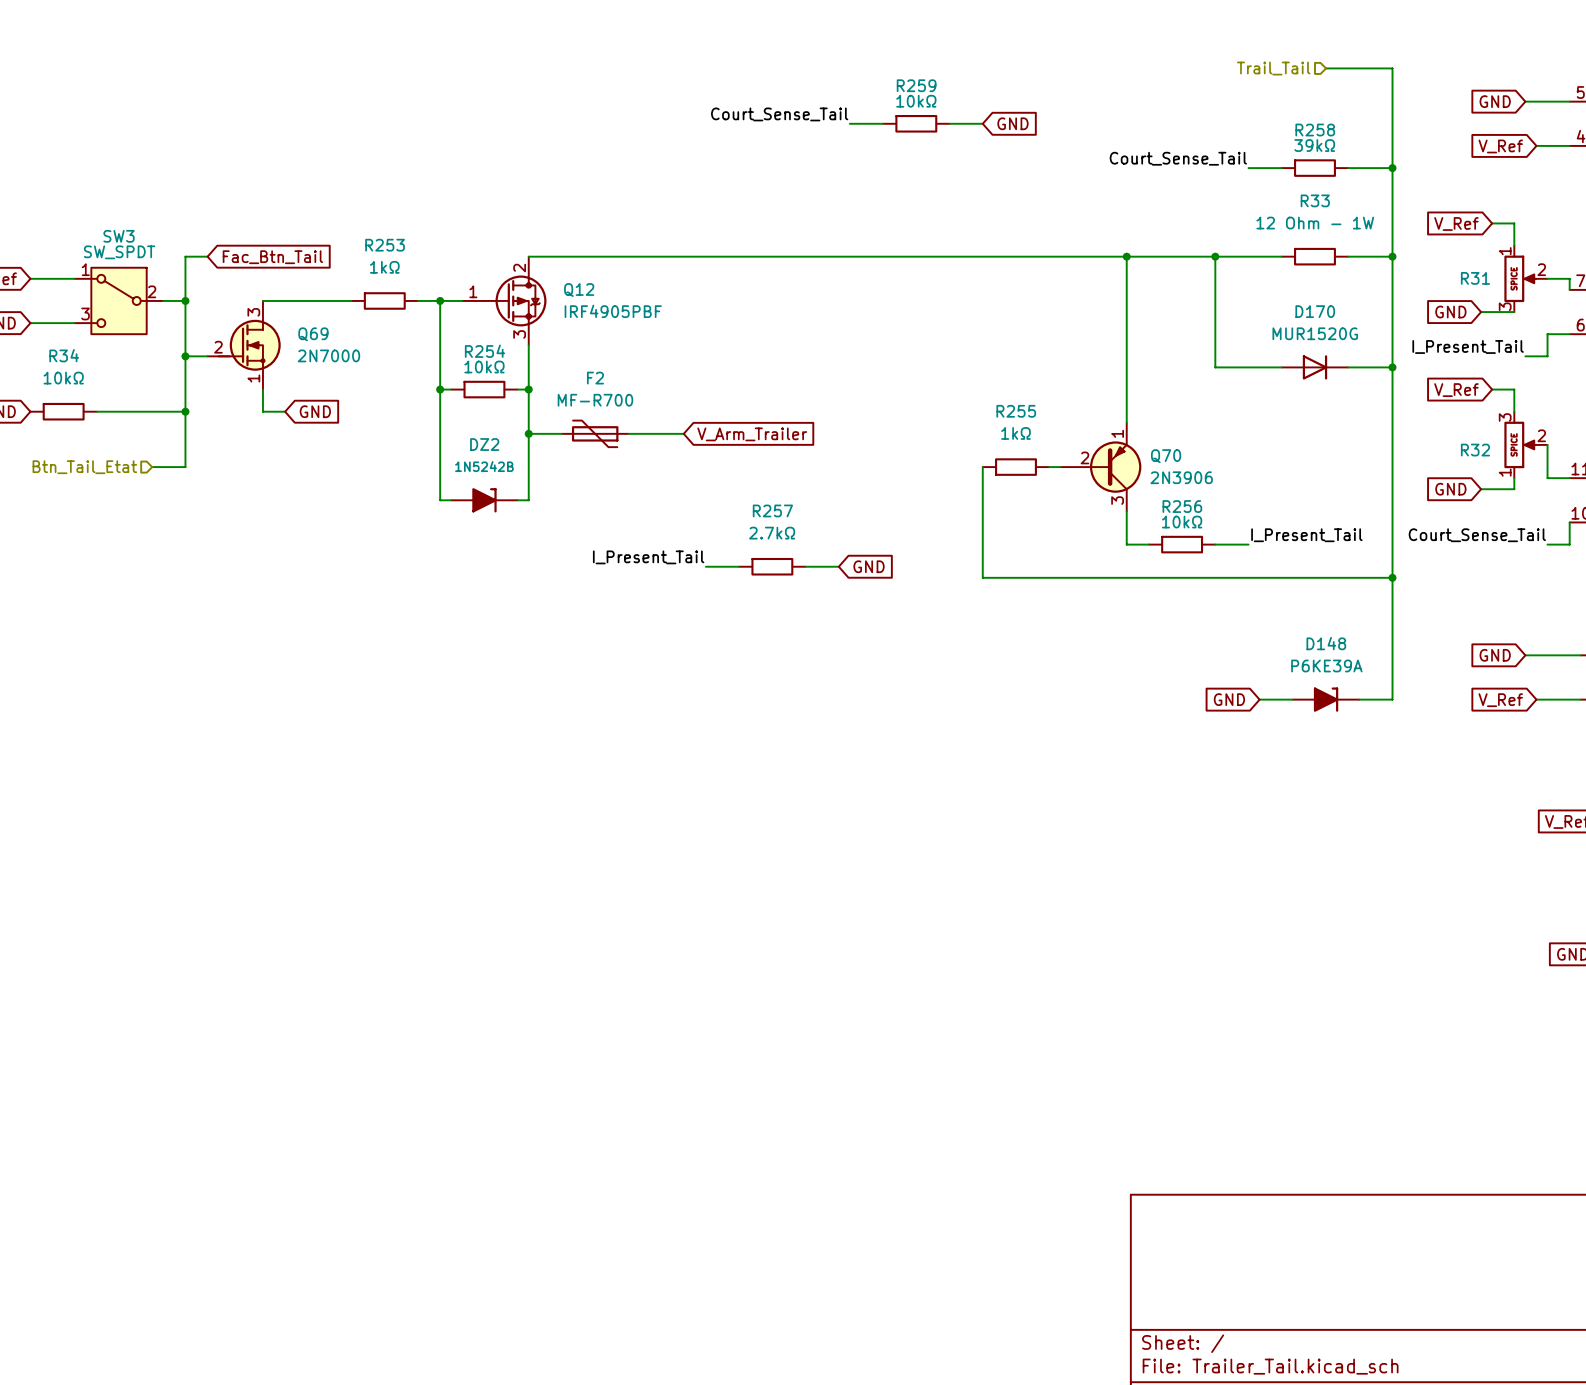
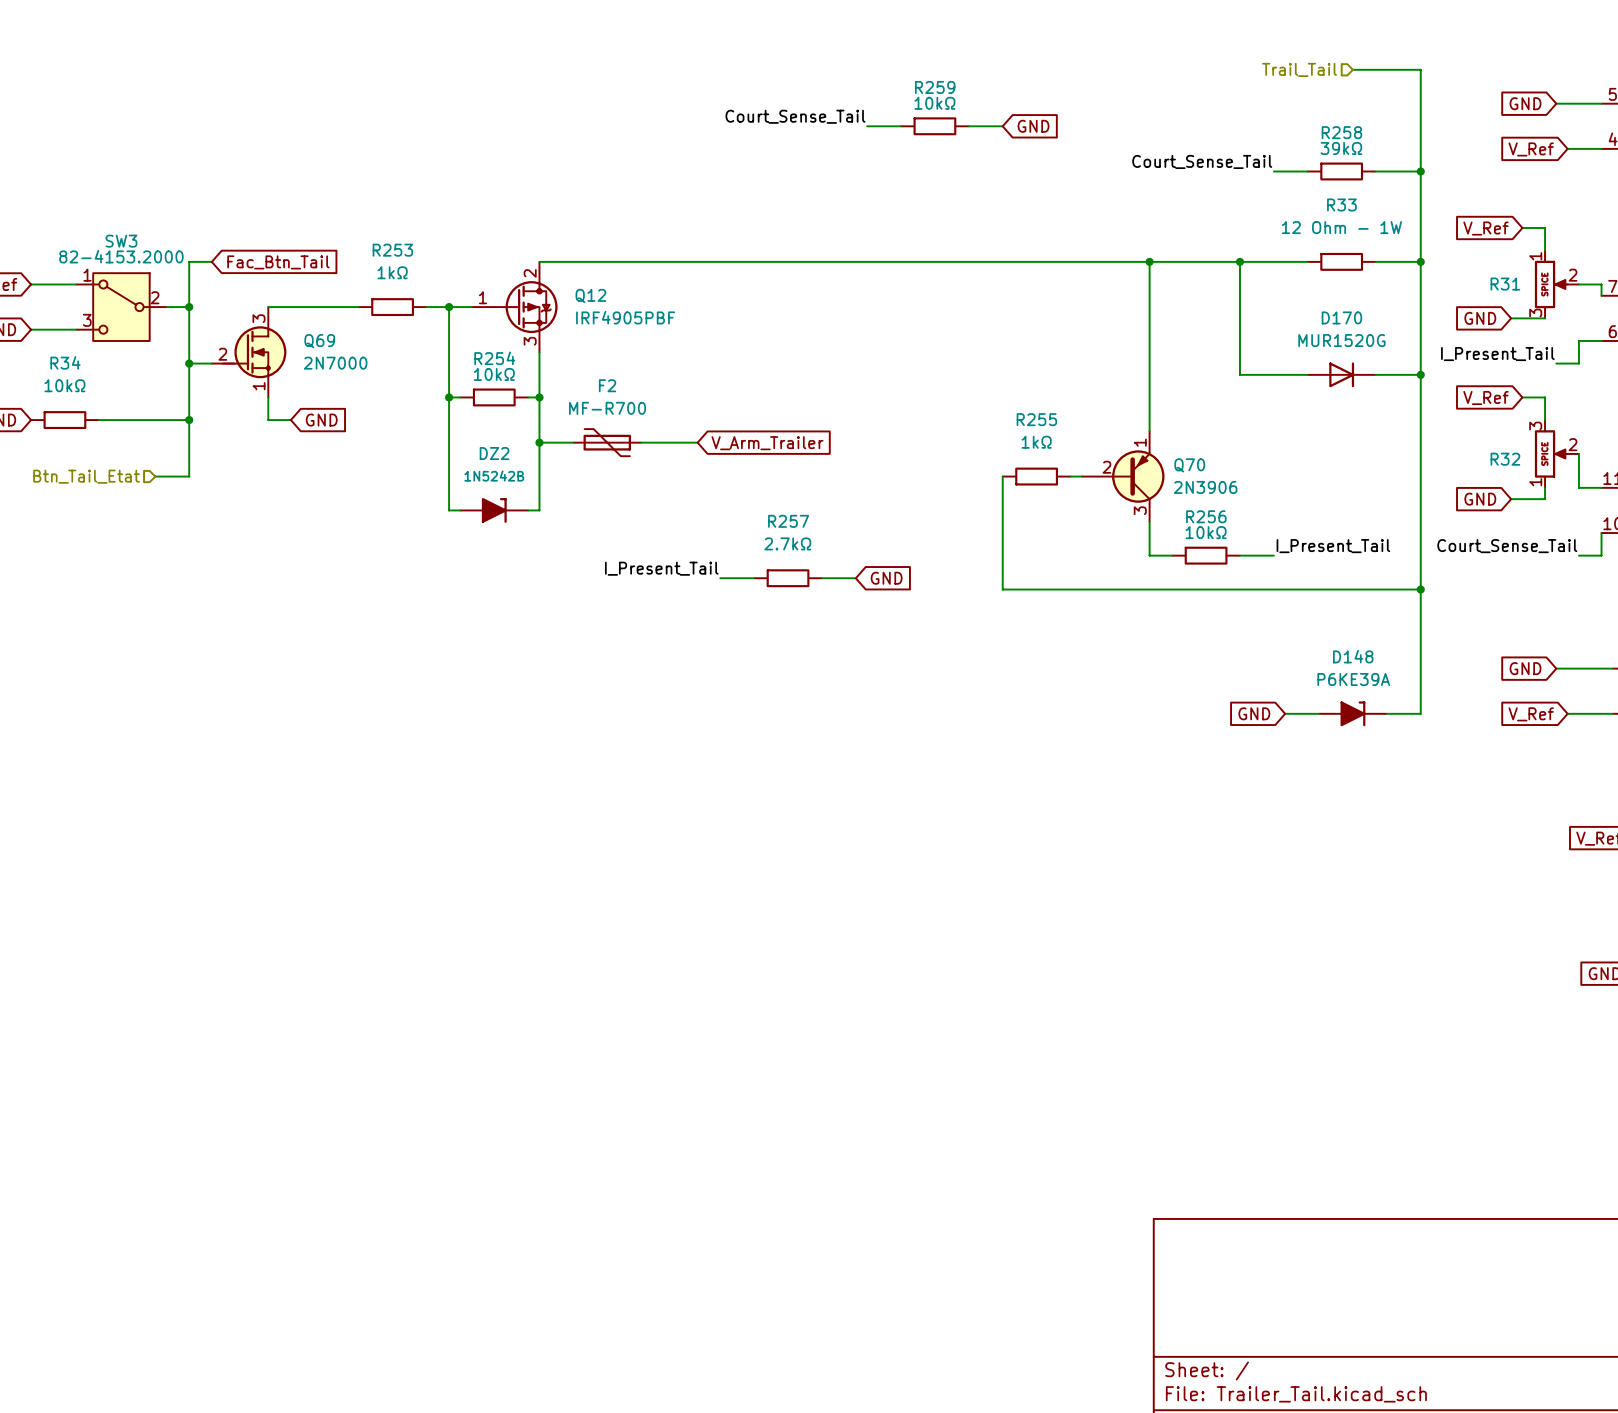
SW3 value: SW_SPDT (119, 252) -> 82-4153.2000 (121, 256)

